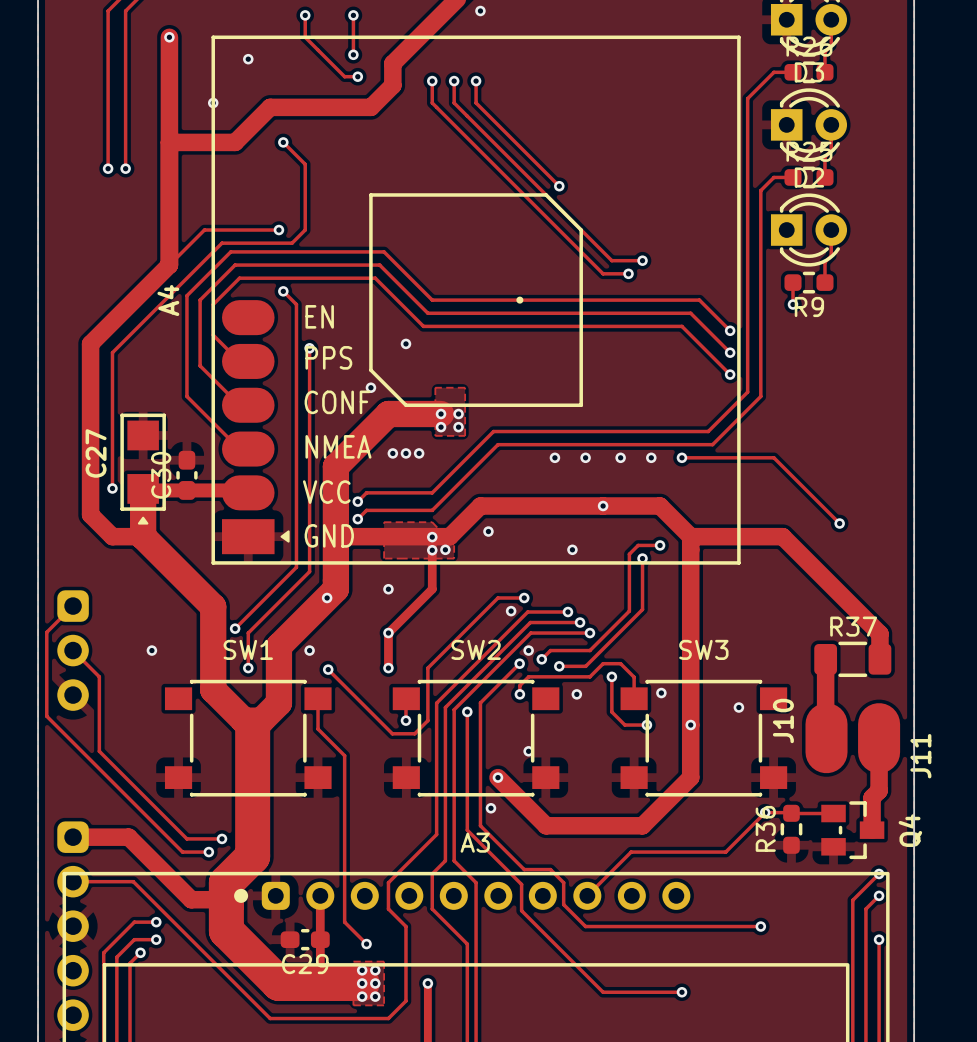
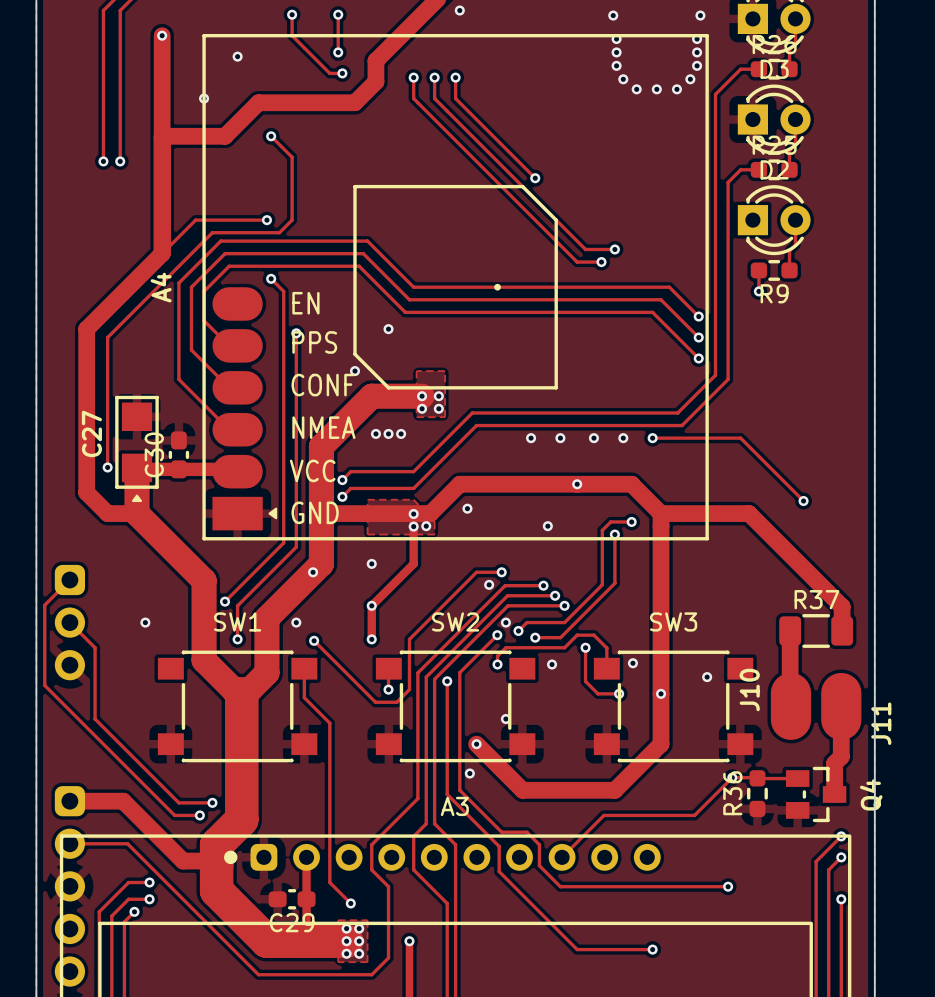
via: none -> (613, 15)
via: none -> (700, 15)
via: none -> (616, 39)
via: none -> (697, 39)
via: none -> (616, 52)
via: none -> (697, 52)
via: none -> (616, 65)
via: none -> (697, 65)
via: none -> (623, 79)
via: none -> (690, 79)
via: none -> (636, 89)
via: none -> (656, 89)
via: none -> (676, 89)

